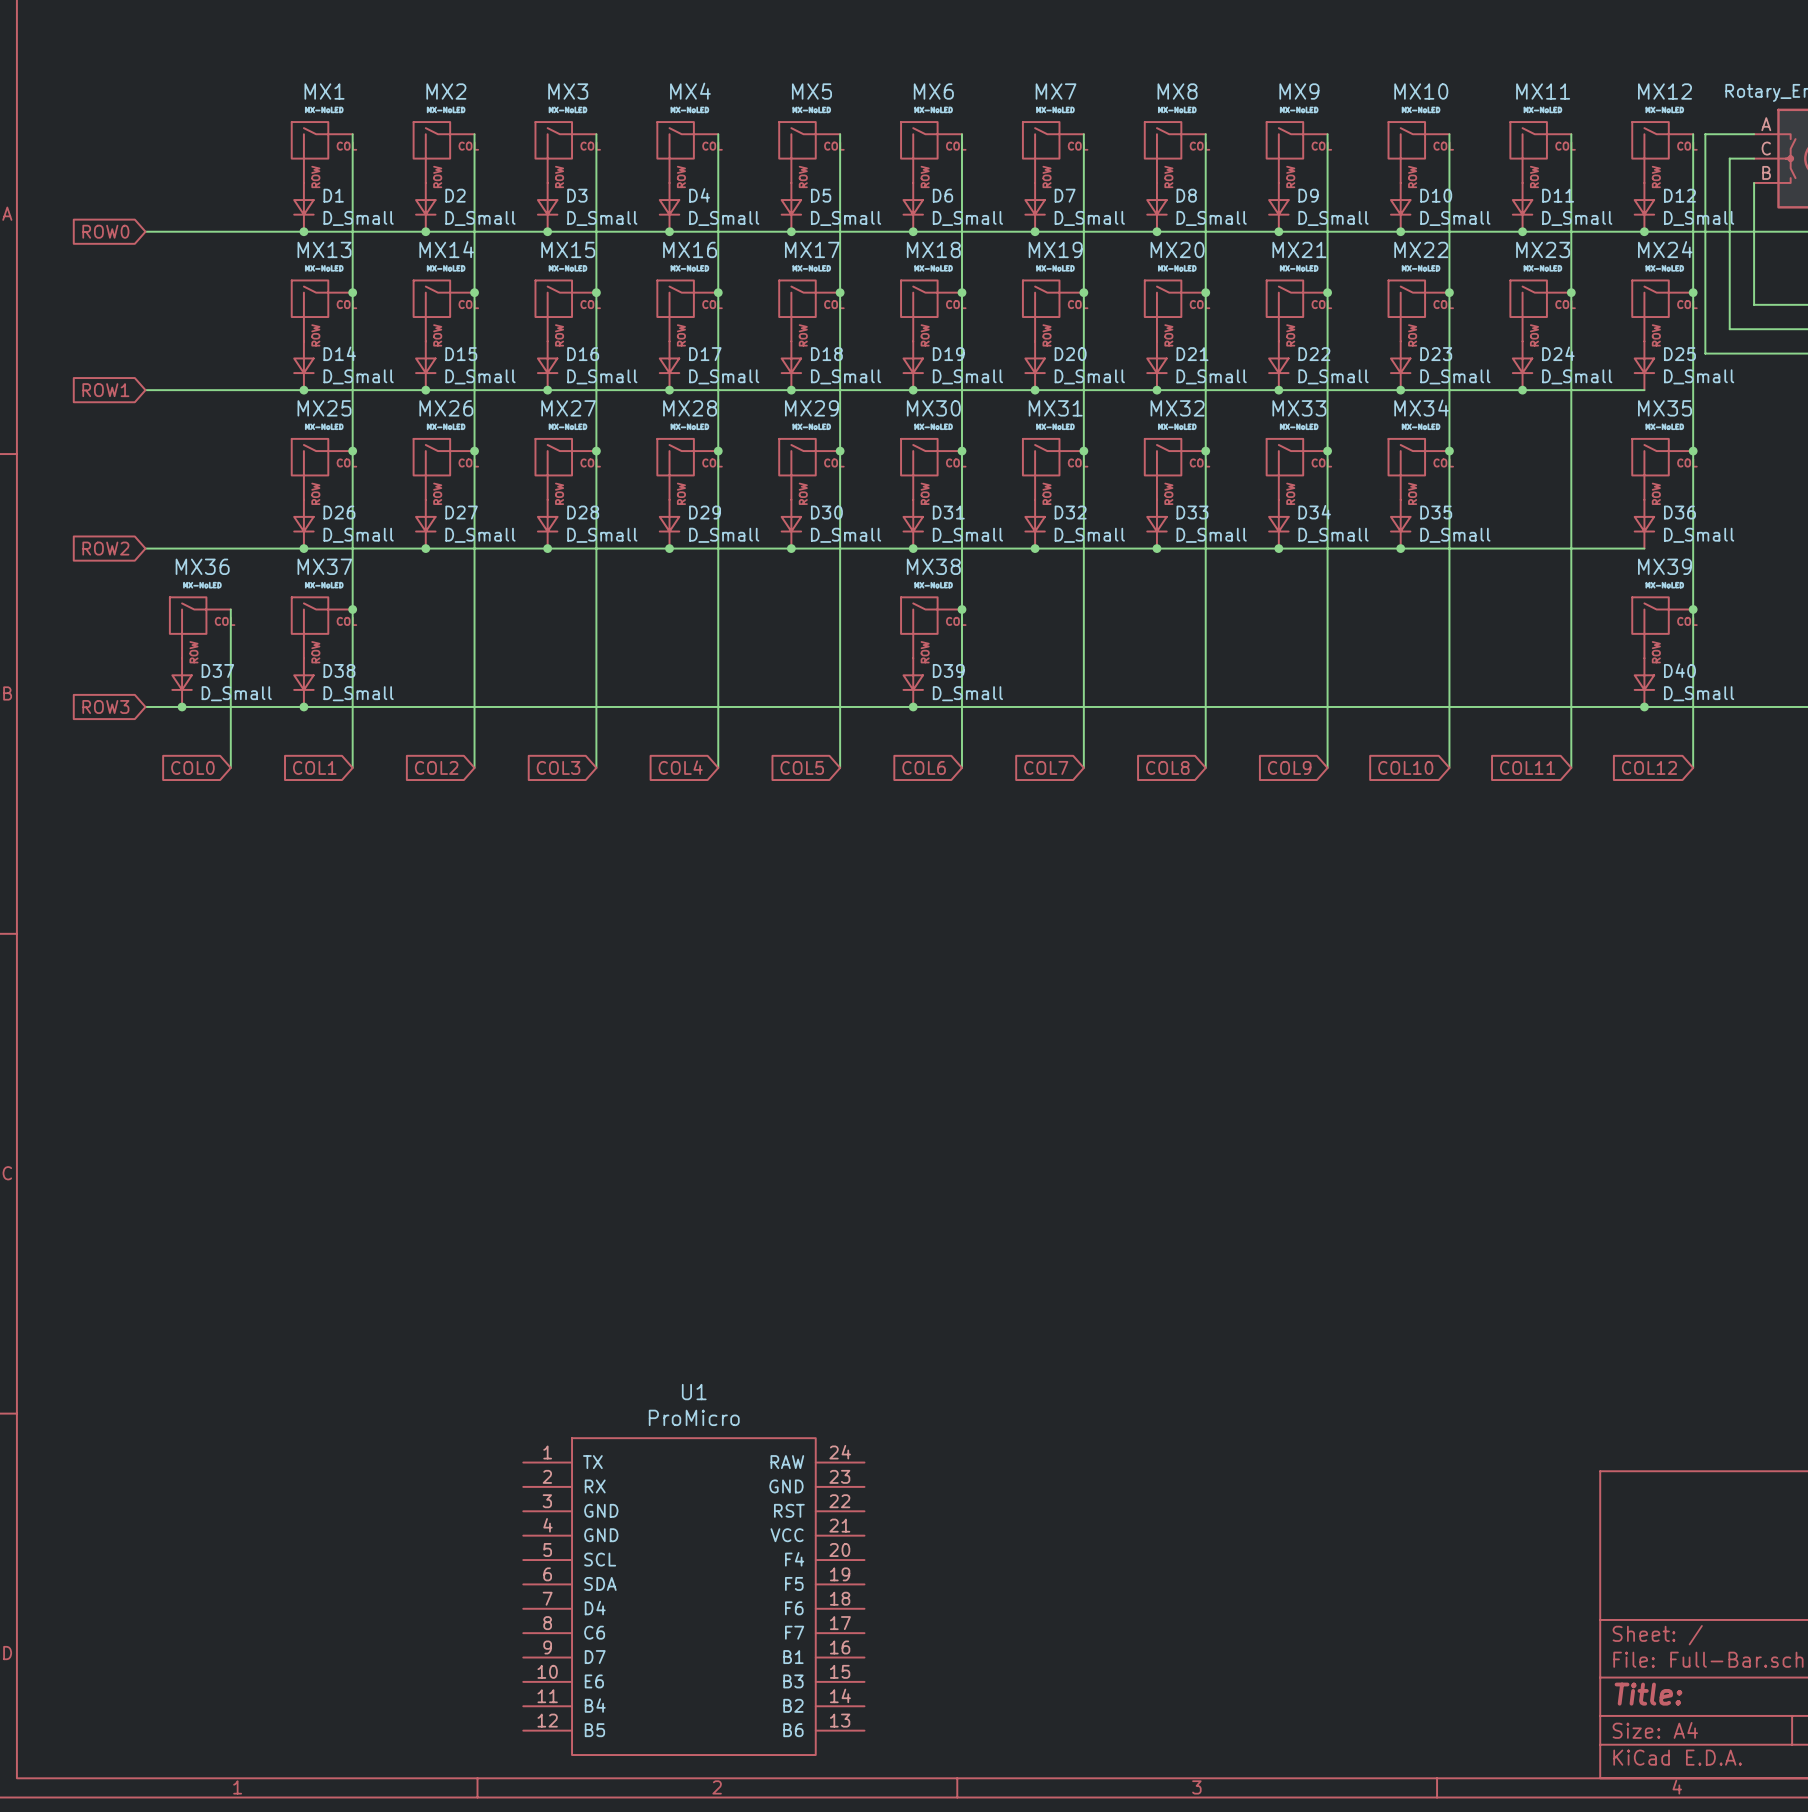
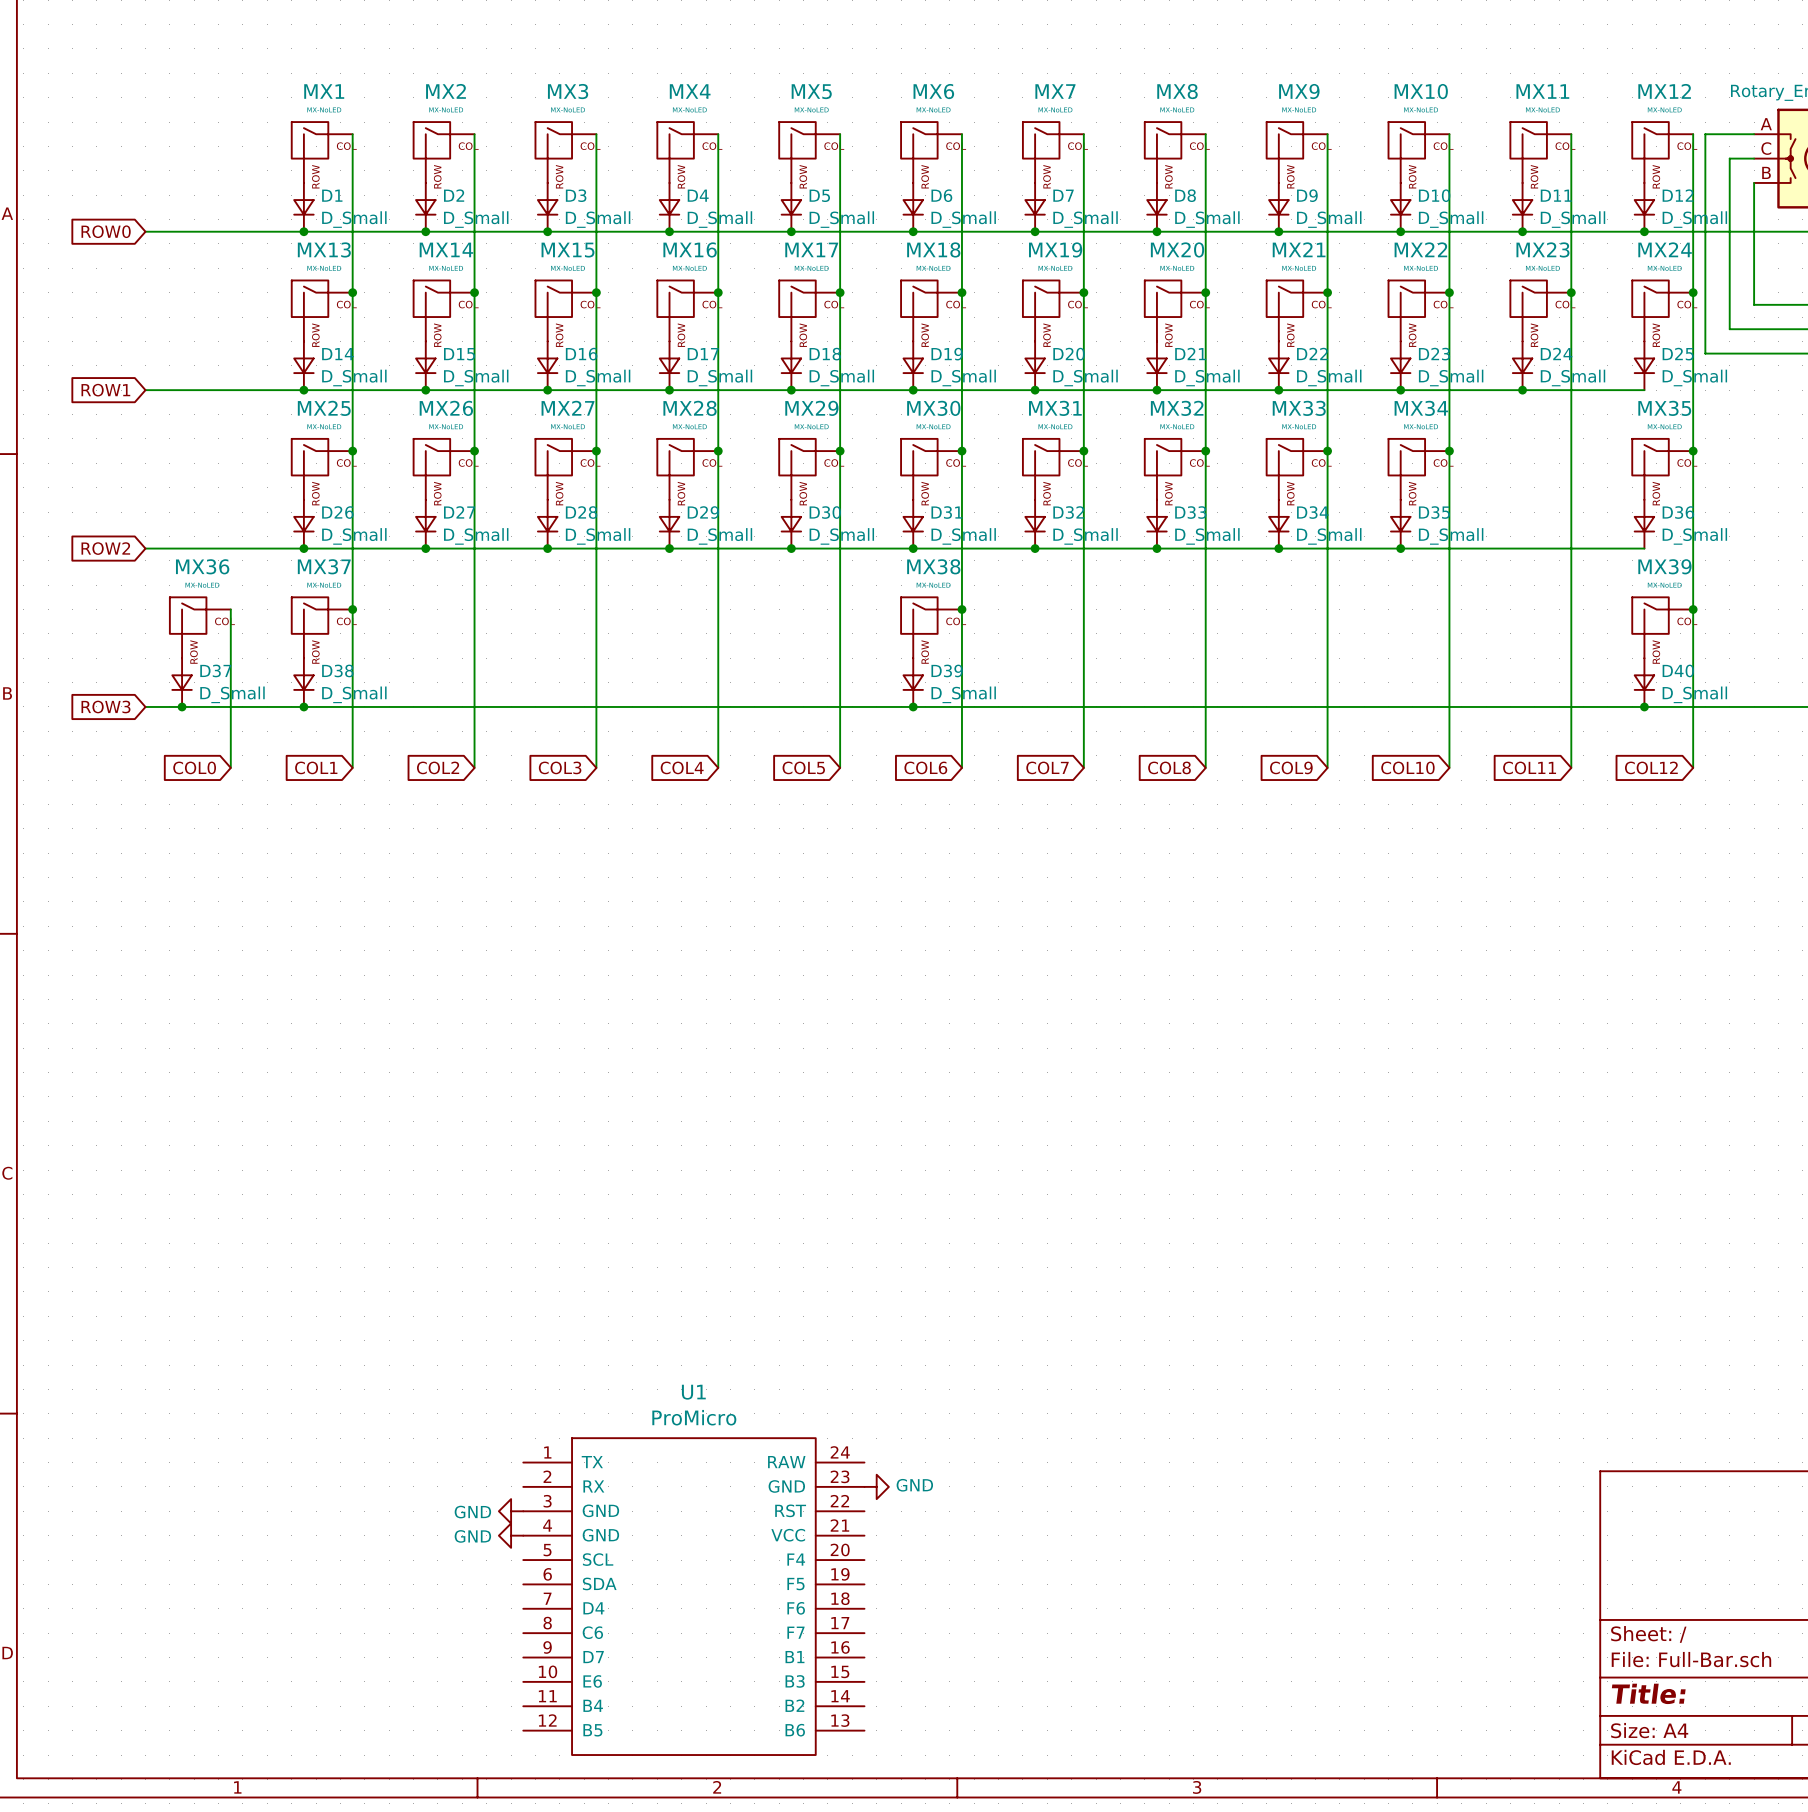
power symbol: none -> GND (876, 1486)
power symbol: none -> GND (511, 1511)
power symbol: none -> GND (511, 1535)

